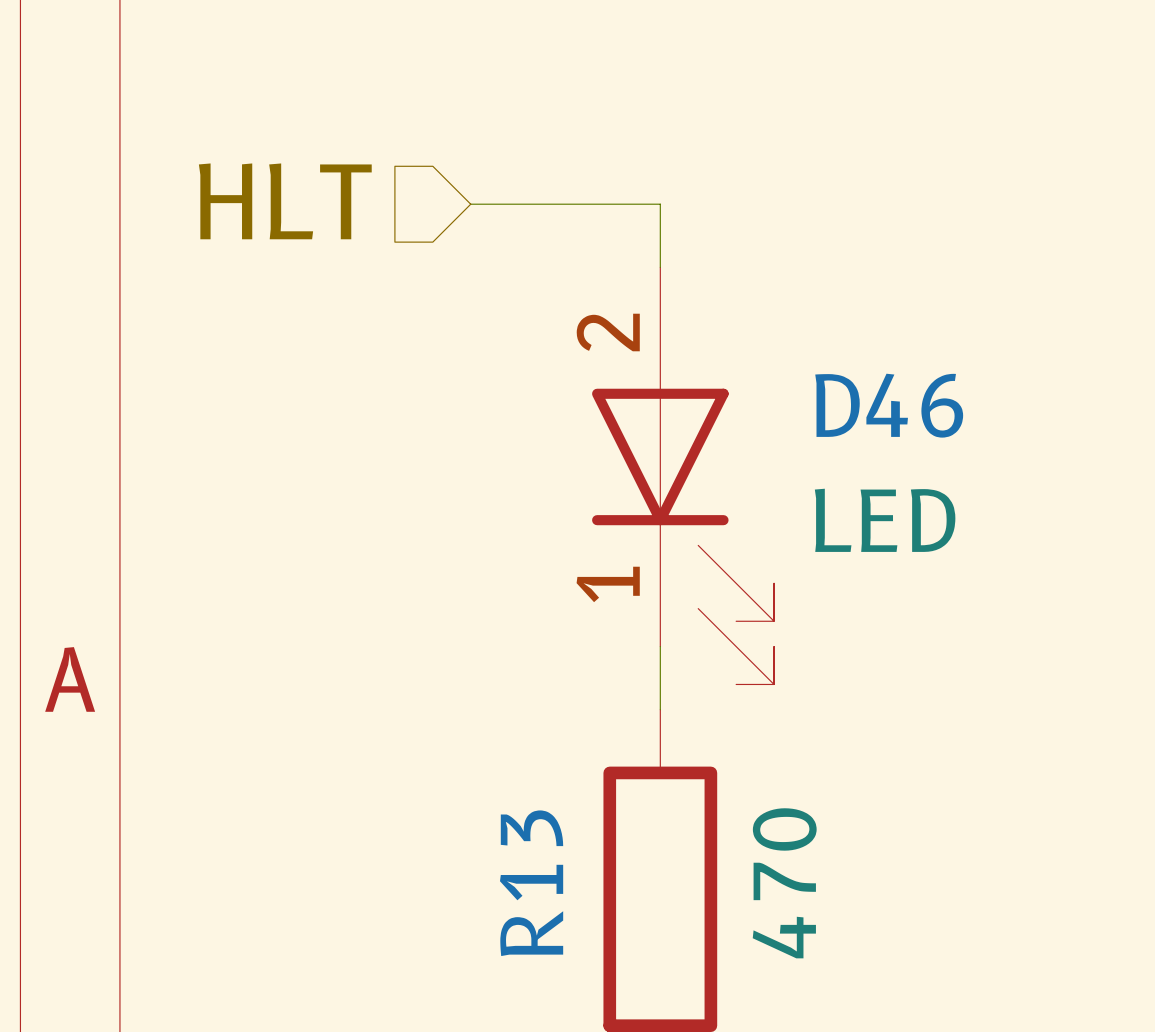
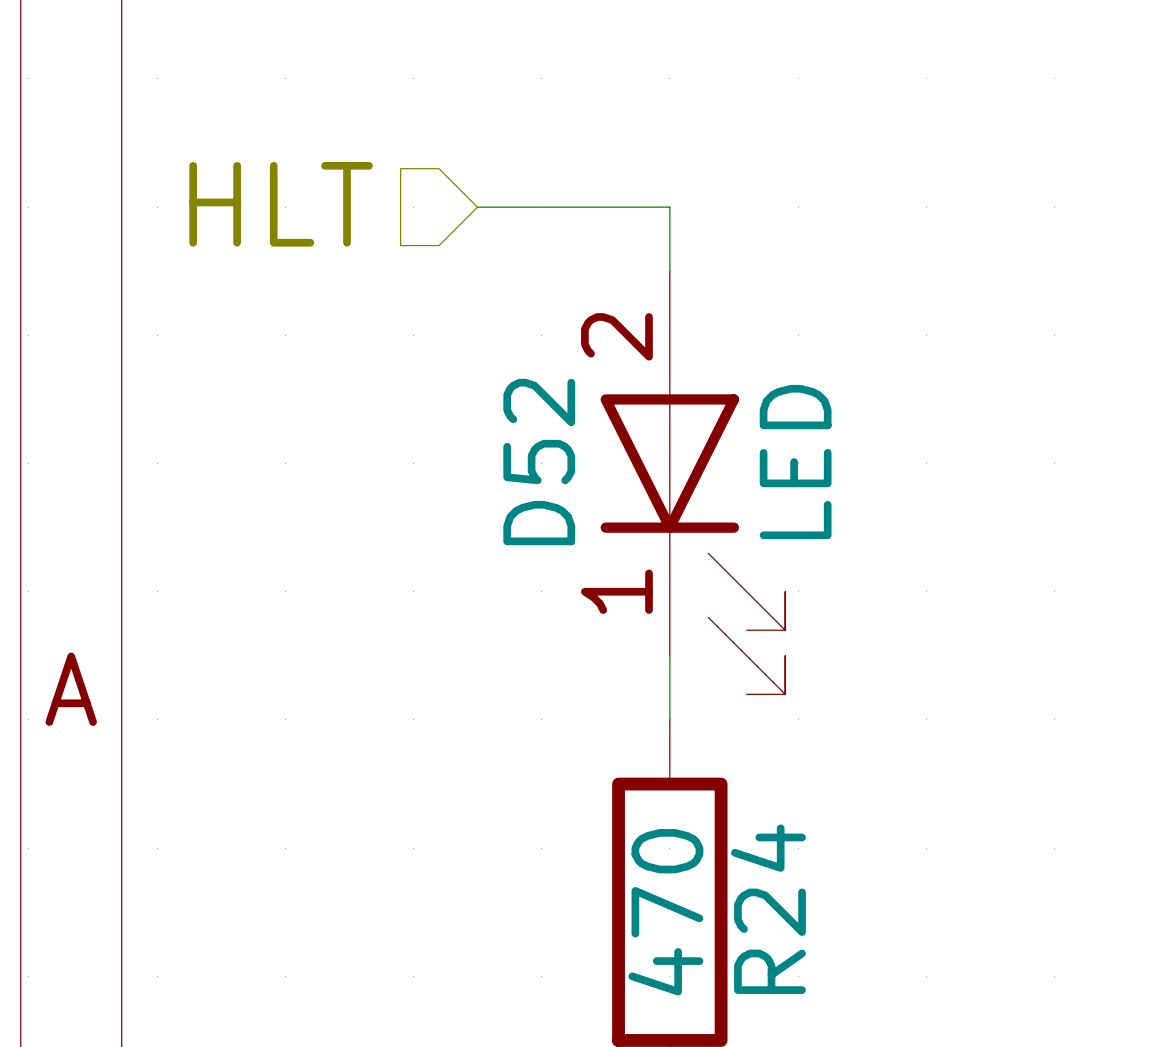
D46 name: D46 (889, 405) -> D52 (539, 462)
D46 value rotation: 0° (885, 520) -> 90° counterclockwise (795, 462)
R13 name: R13 (531, 883) -> R24 (768, 909)
R13 value position: 470 (784, 883) -> 470 (665, 912)

